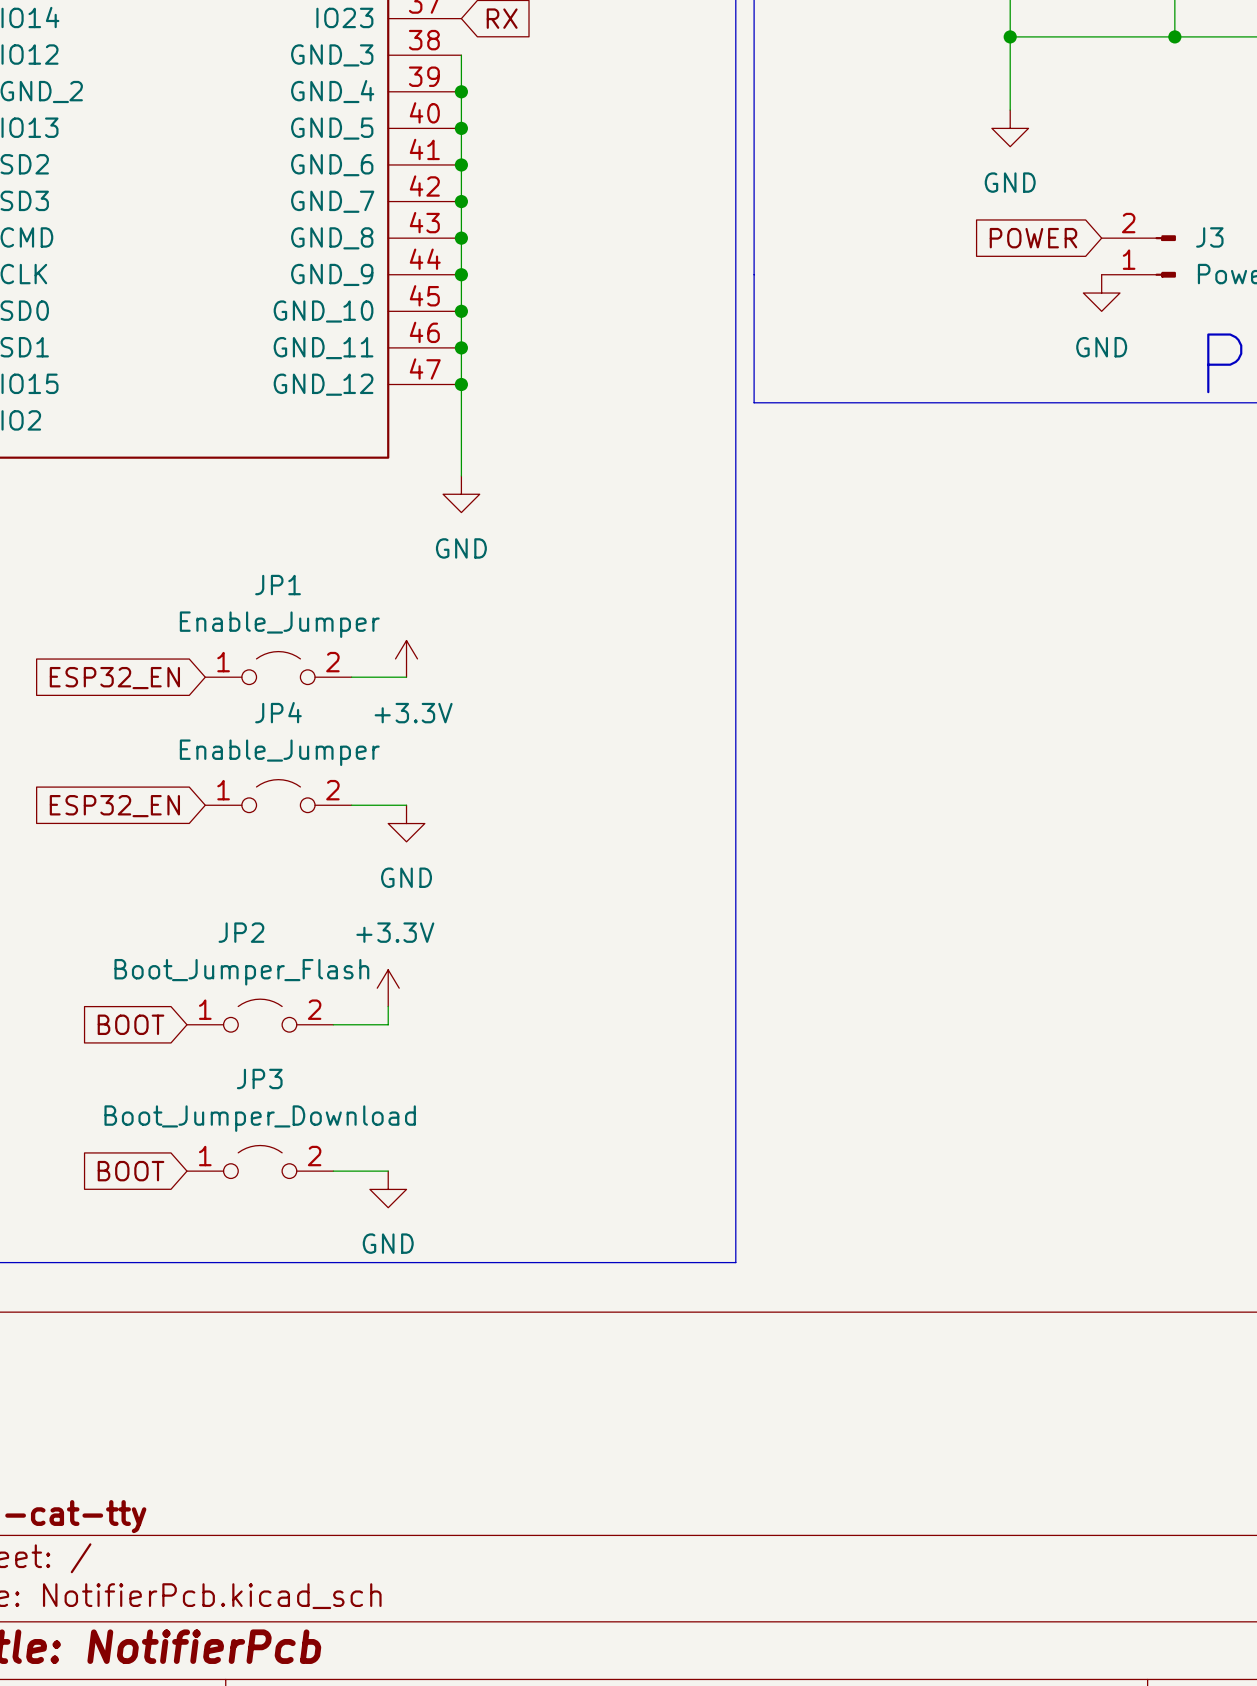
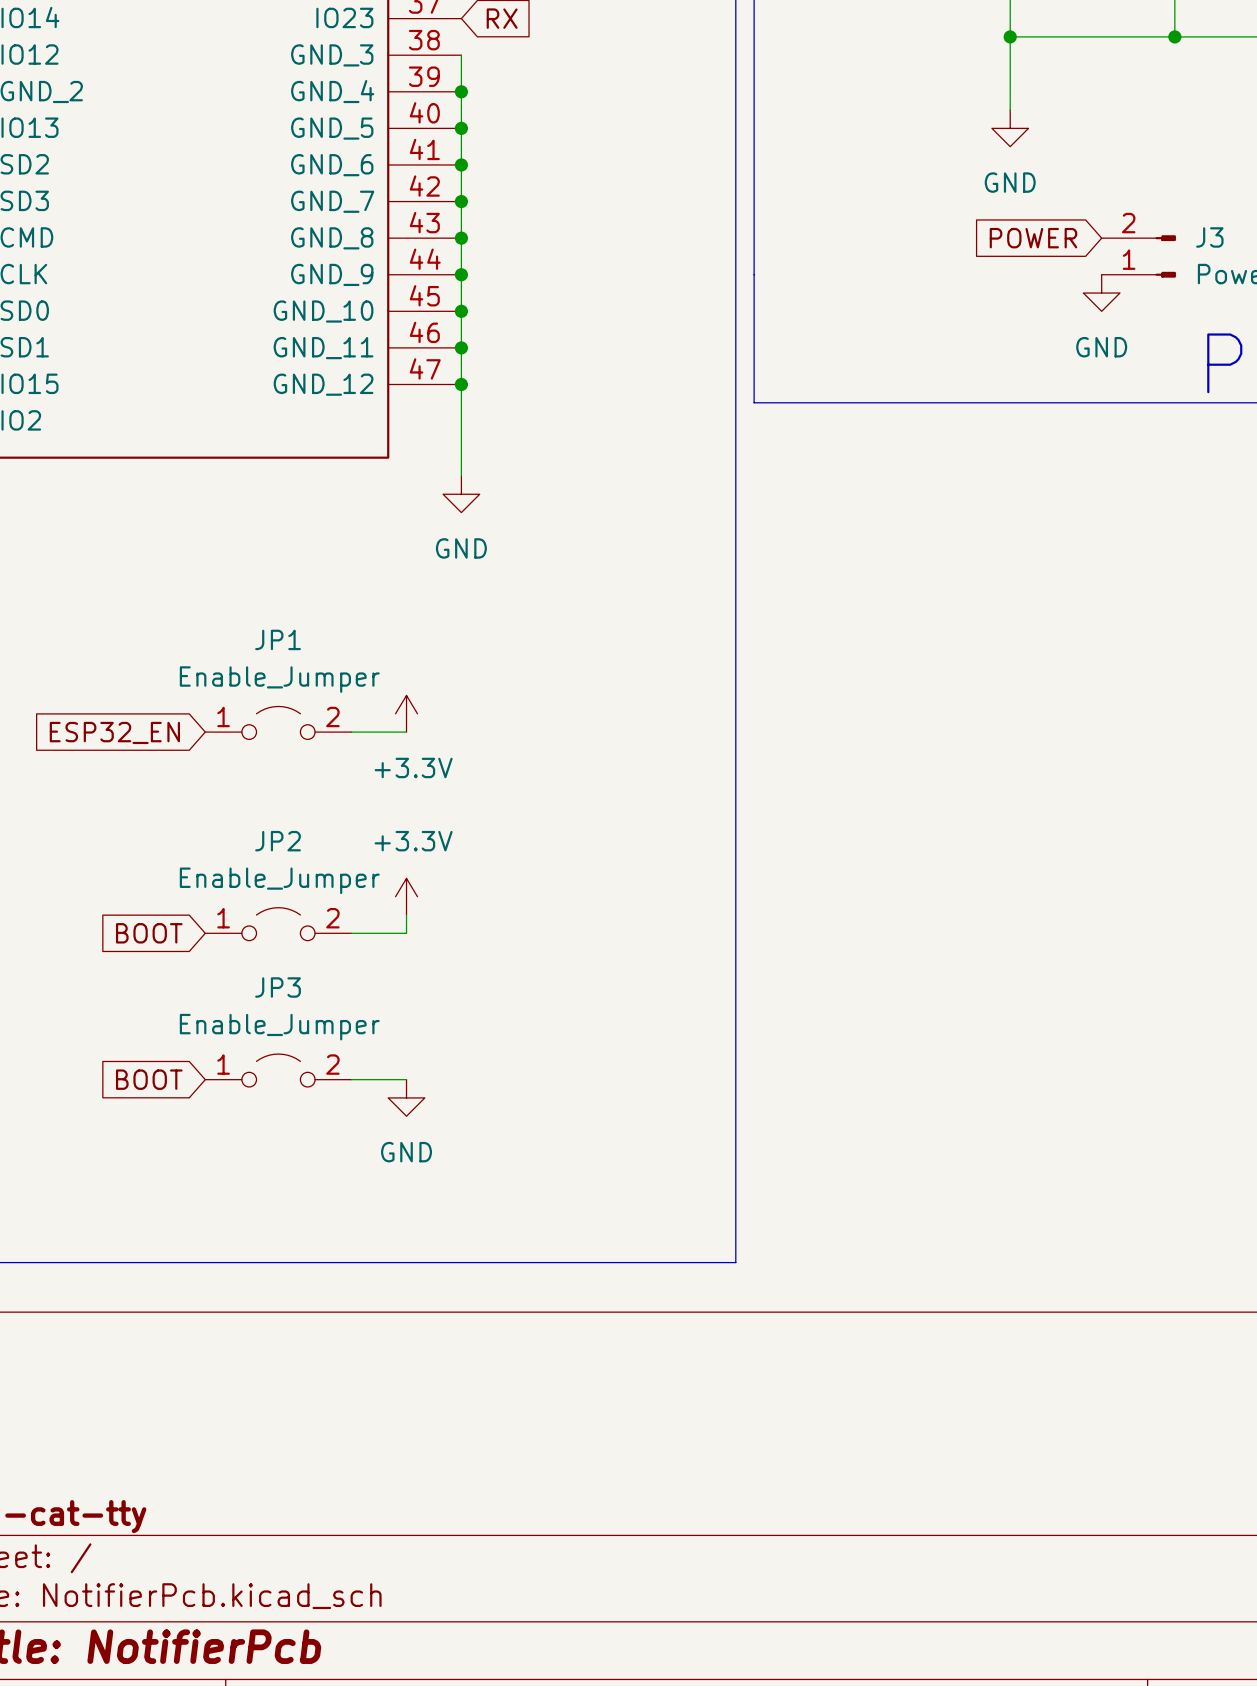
power symbol position: +3.3V (406, 658) -> +3.3V (406, 713)
JP1 position: (278, 668) -> (278, 722)
wire: (351, 677) (406, 677) -> (351, 732) (406, 732)
global label: ESP32_EN (114, 678) -> none
global label: none -> ESP32_EN (114, 732)
JP4: Enable_Jumper (278, 796) -> none
wire: (351, 805) (406, 805) -> none
global label: ESP32_EN (114, 806) -> none
power symbol: GND (406, 823) -> none
JP2 name position: JP2 (241, 932) -> JP2 (278, 841)
global label: none -> BOOT (149, 933)
JP2 value: Boot_Jumper_Flash (241, 972) -> Enable_Jumper (279, 880)
power symbol position: +3.3V (388, 988) -> +3.3V (406, 896)
wire: (388, 1006) (388, 1024) (333, 1024) -> (406, 915) (406, 933) (351, 933)
JP2 position: (260, 1015) -> (278, 924)
global label: BOOT (131, 1024) -> none
global label: none -> BOOT (149, 1079)
JP3 value: Boot_Jumper_Download (260, 1118) -> Enable_Jumper (279, 1027)
JP3 position: (260, 1161) -> (278, 1070)
global label: BOOT (131, 1171) -> none
wire: (333, 1171) (388, 1171) -> (351, 1079) (406, 1079)
power symbol position: GND (388, 1189) -> GND (406, 1097)

